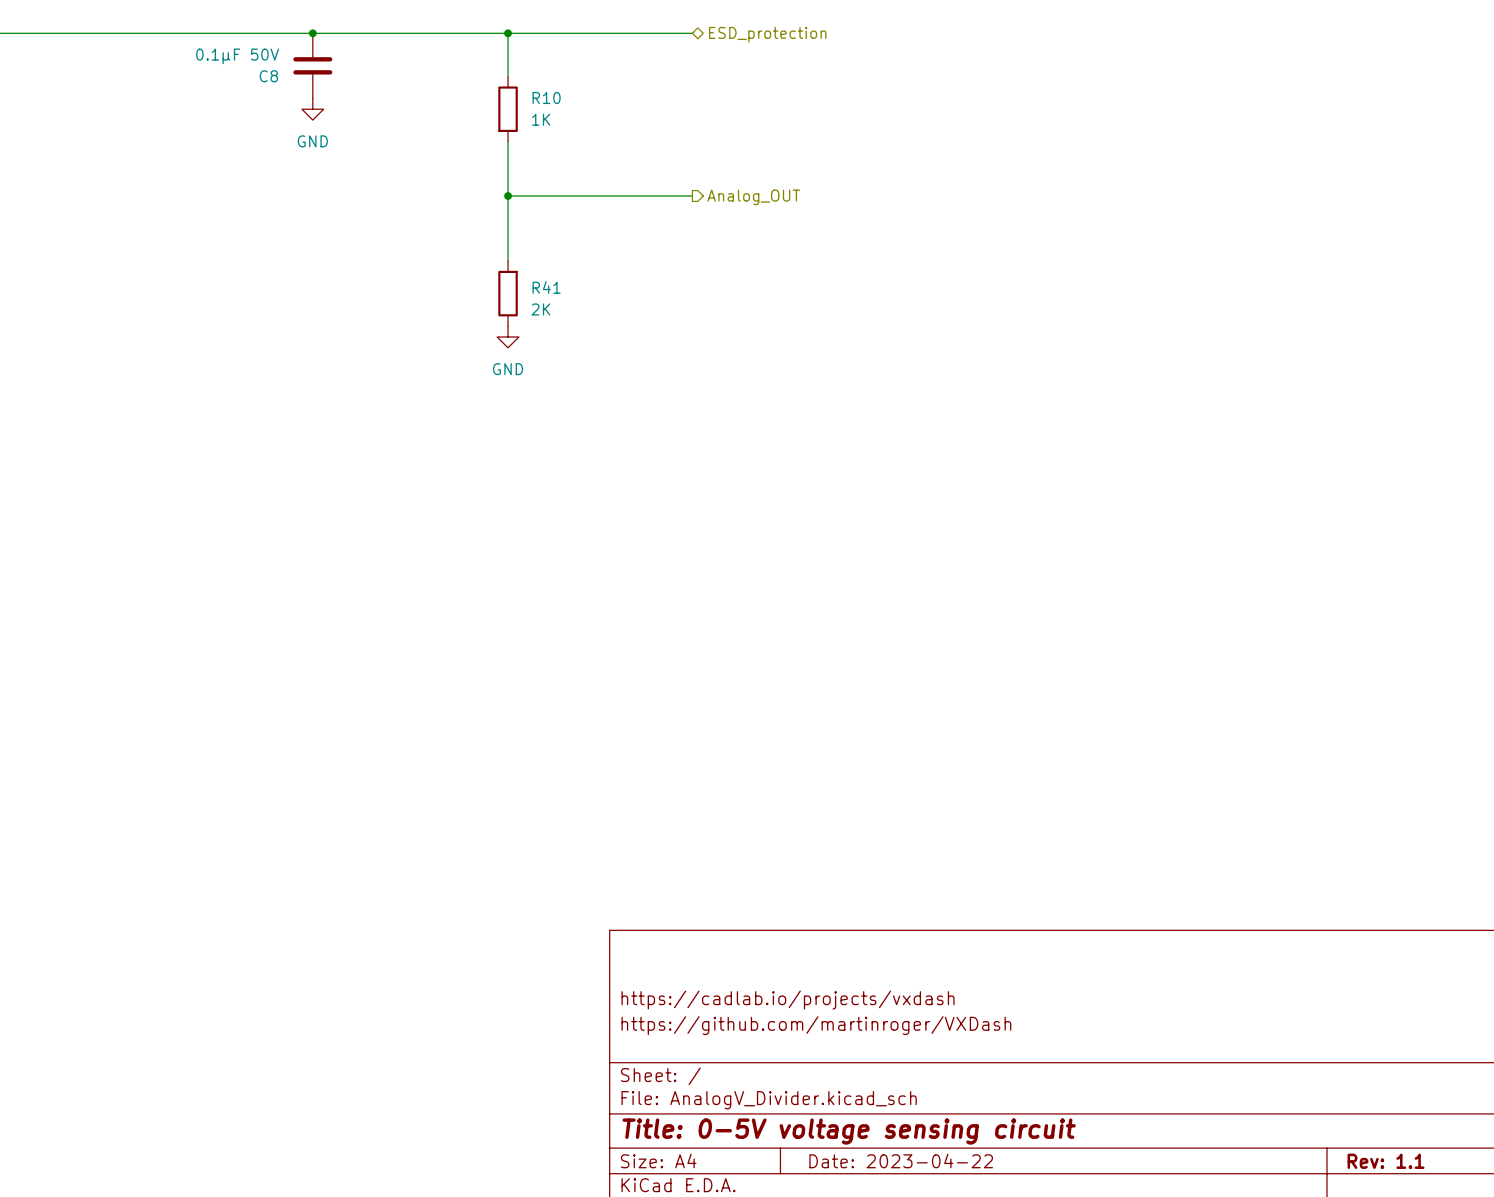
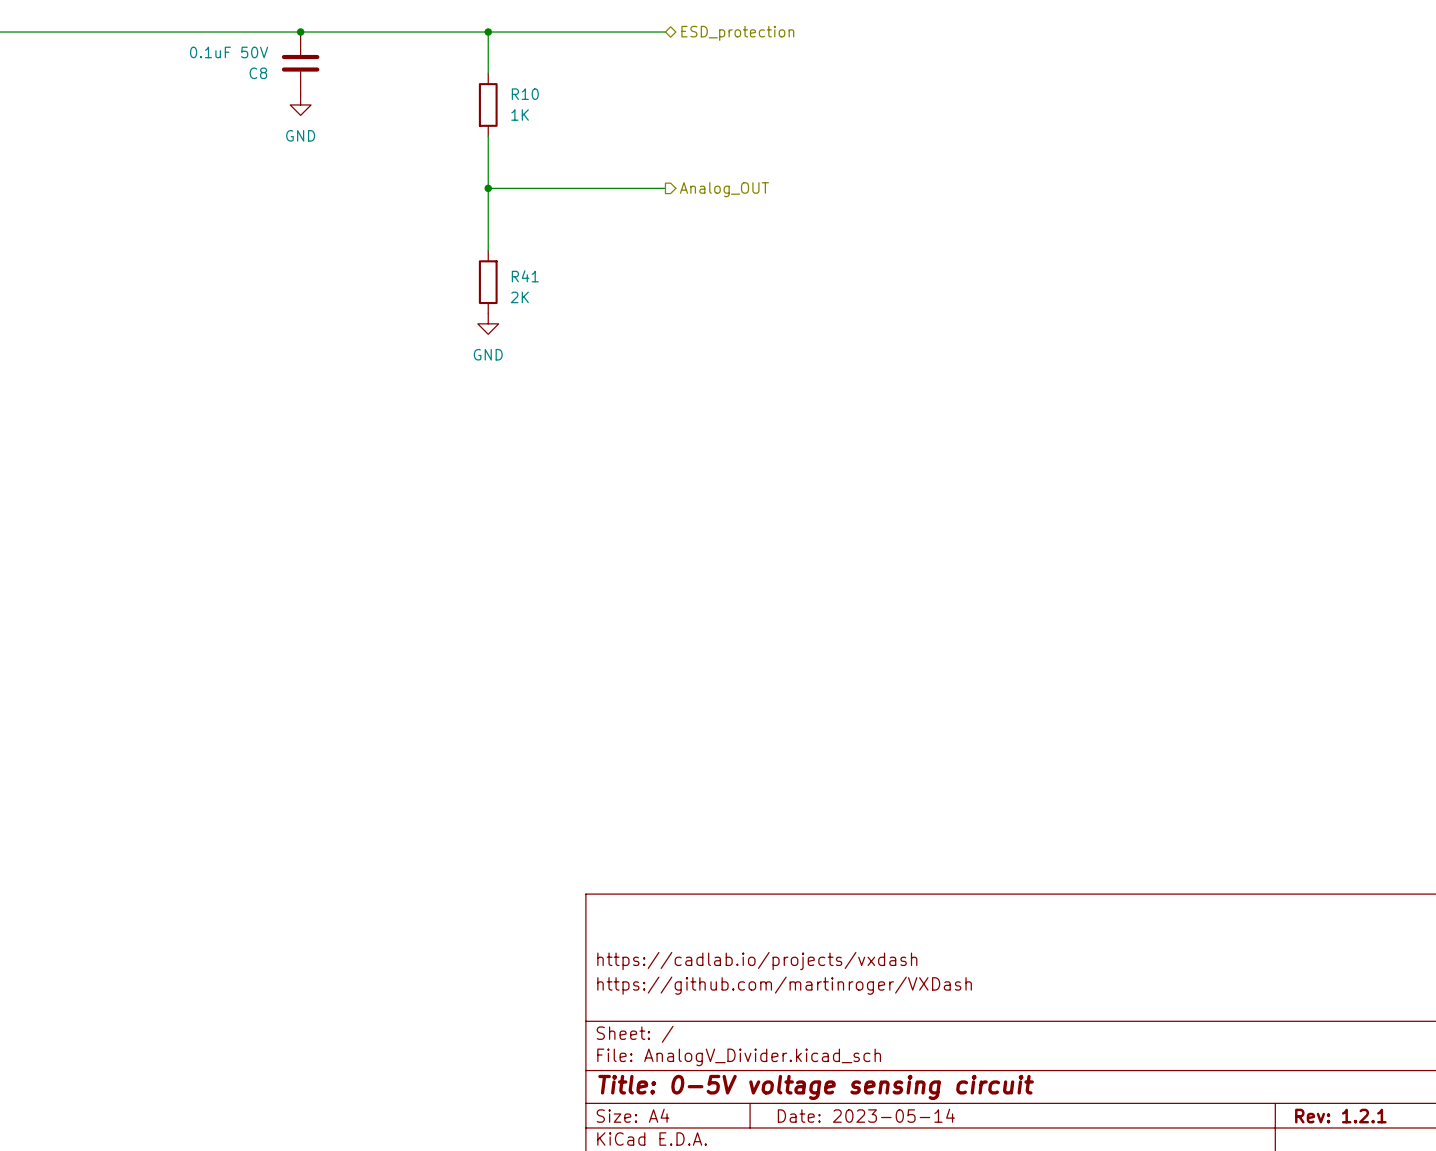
C8 value: 0.1µF 50V (237, 56) -> 0.1uF 50V (229, 52)
title block: Date: 2023-04-22 (901, 1160) -> Date: 2023-05-14 (866, 1115)
title block: Rev: 1.1 (1386, 1161) -> Rev: 1.2.1 (1340, 1116)

